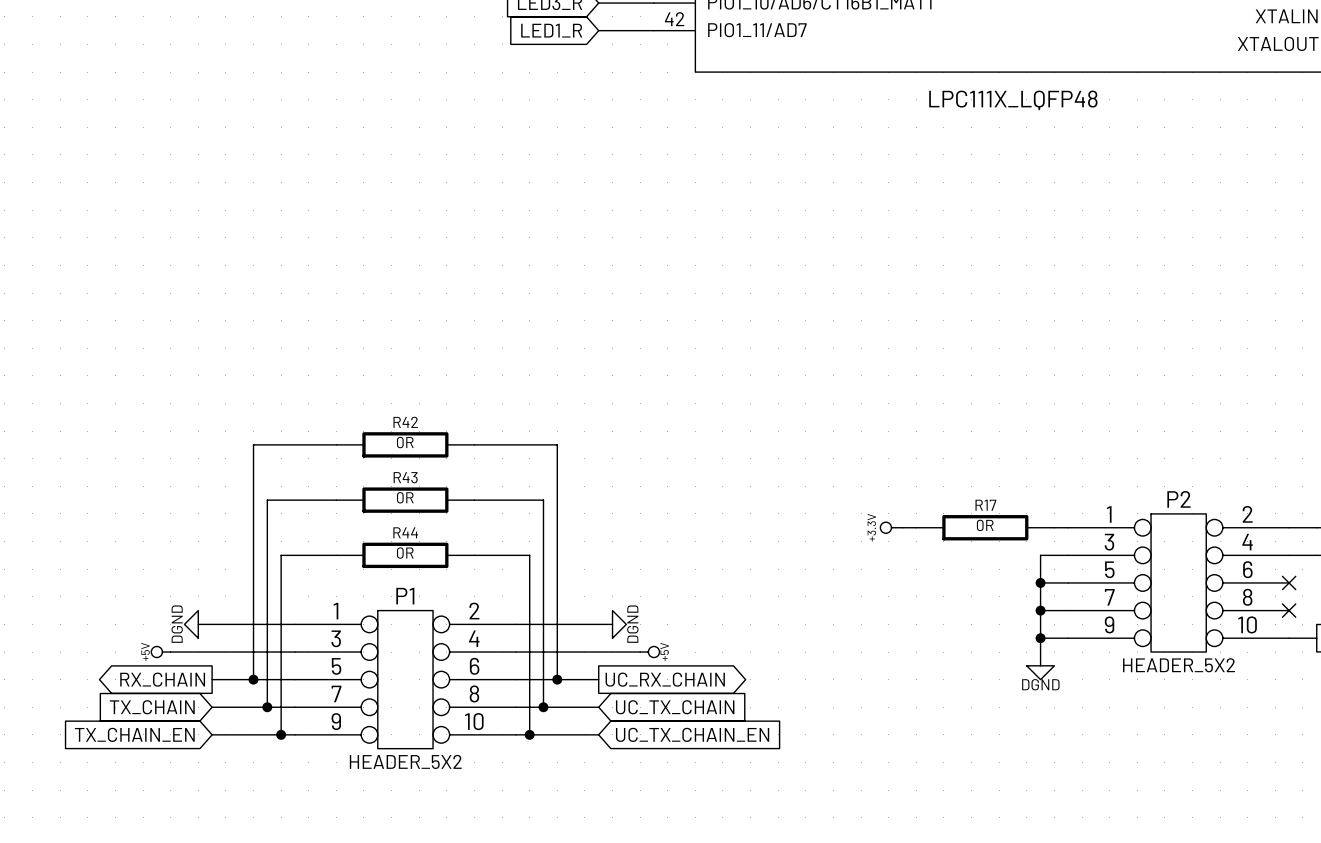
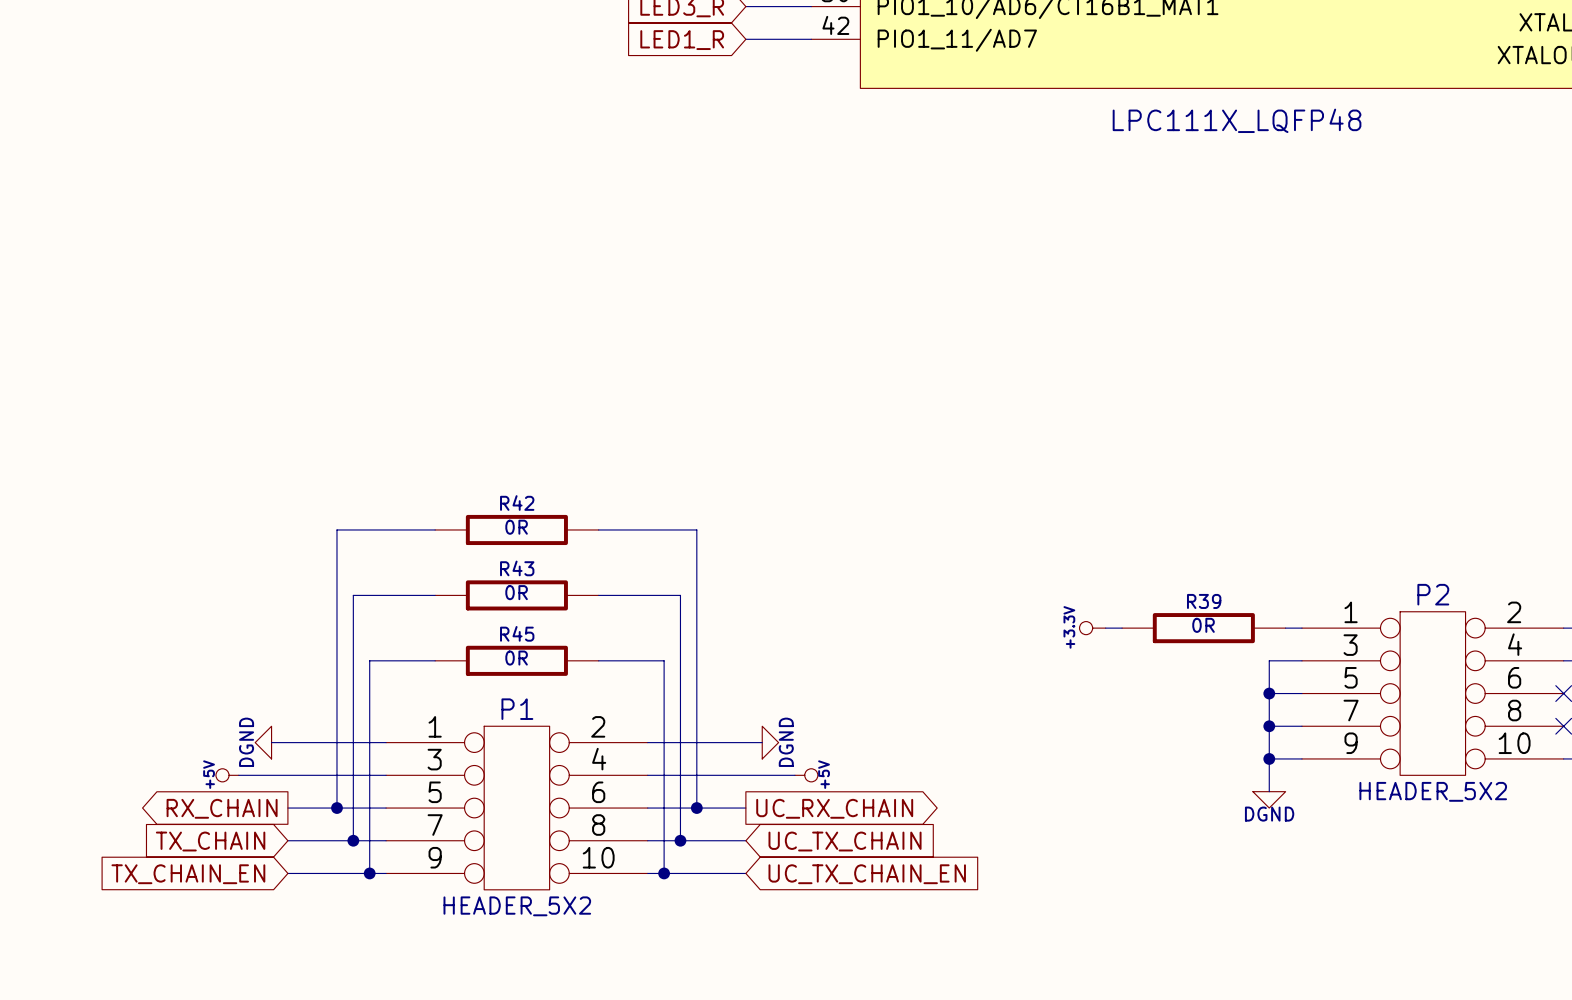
R17 name: R17 (985, 505) -> R39 (1204, 601)
R44 name: R44 (405, 532) -> R45 (517, 633)

